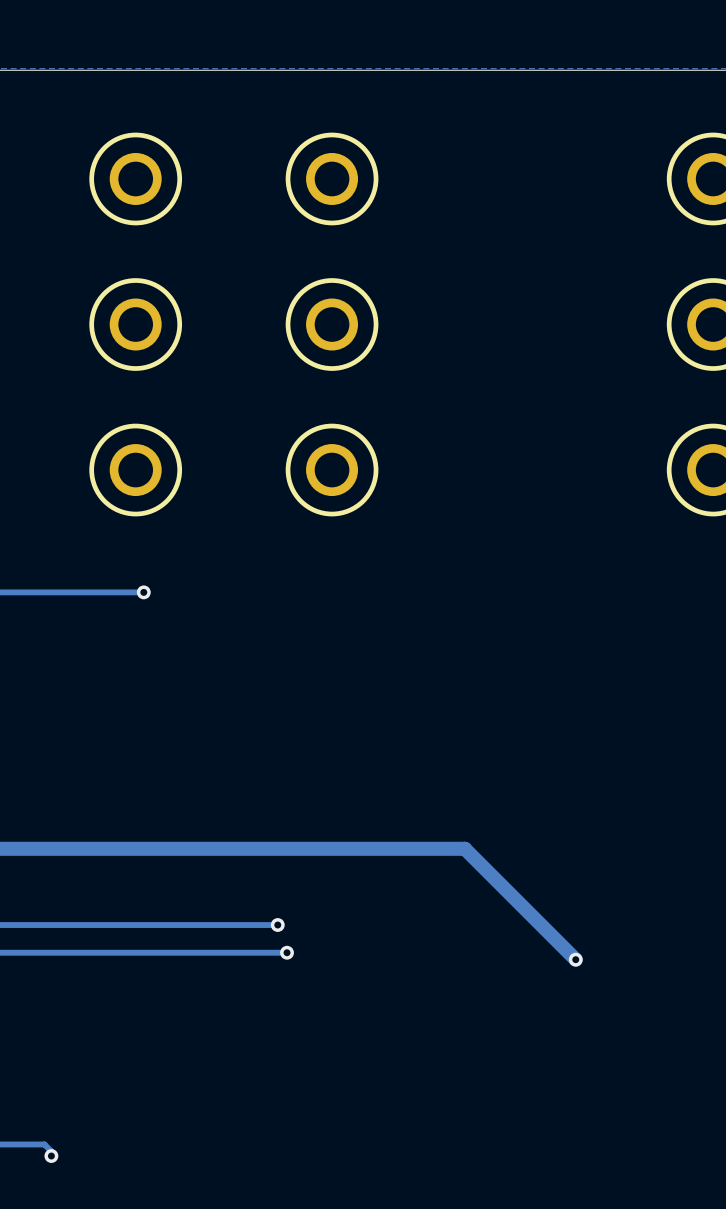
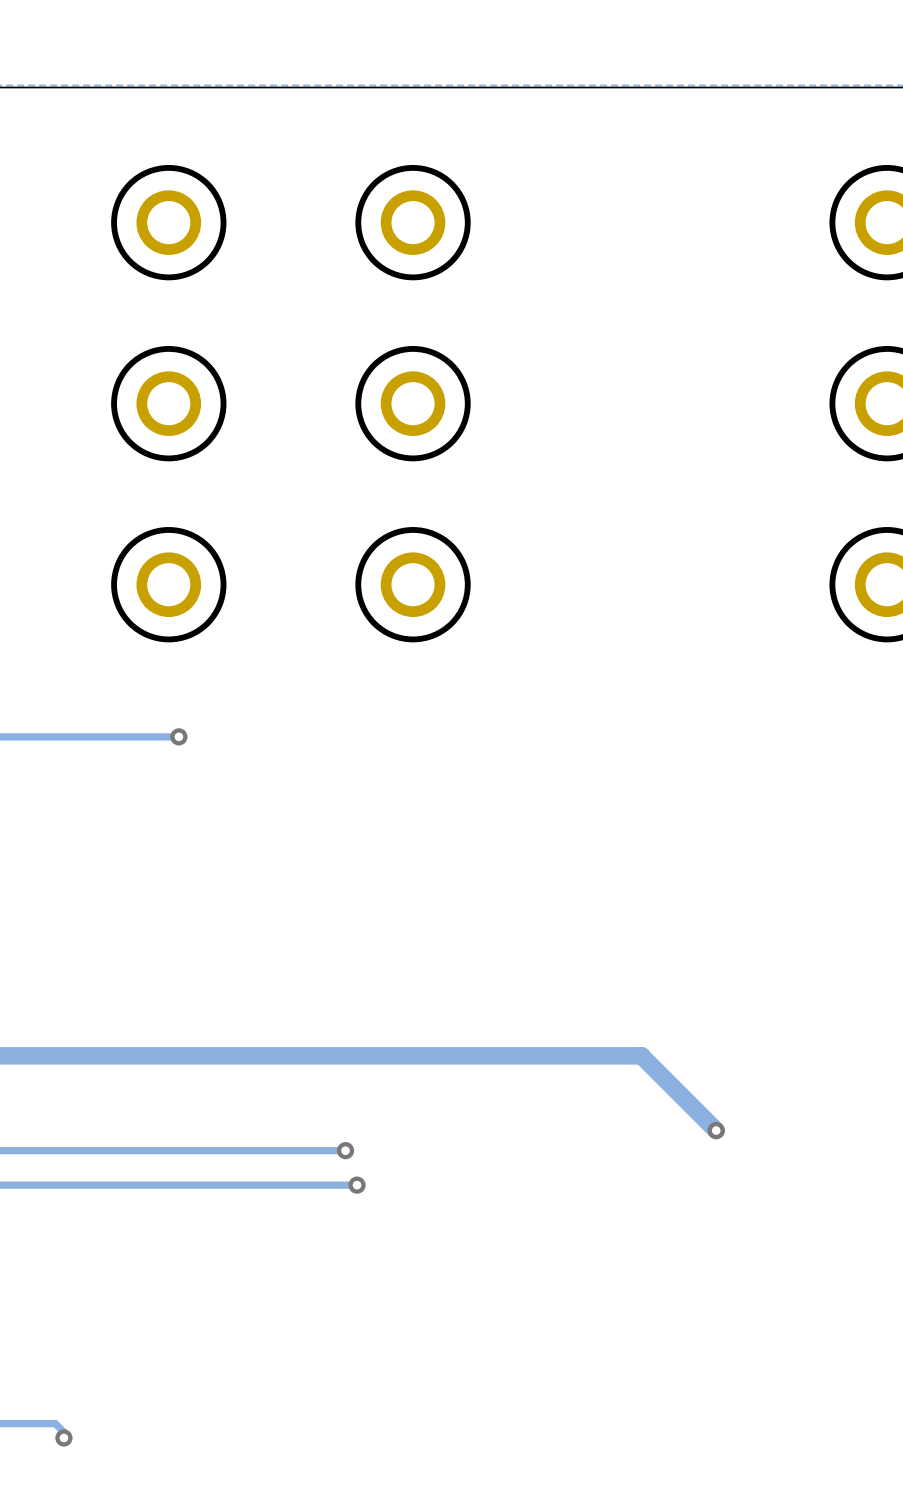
track: (464, 848) (575, 959) -> (578, 1055) (641, 1055) (716, 1130)
via position: (575, 959) -> (716, 1130)

